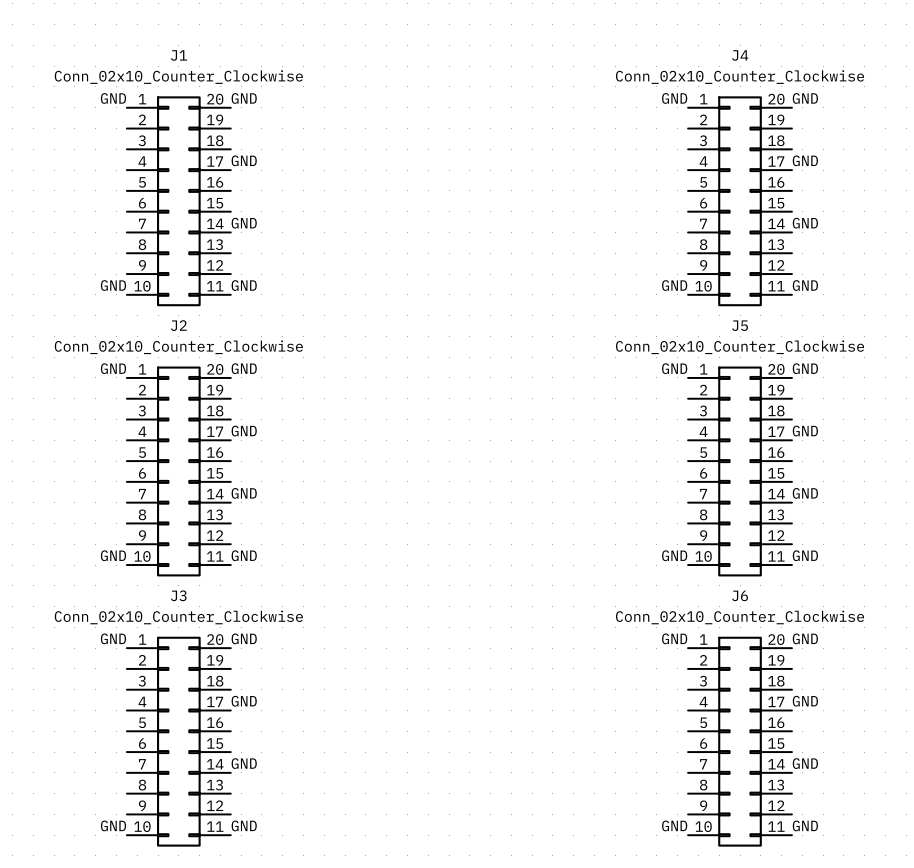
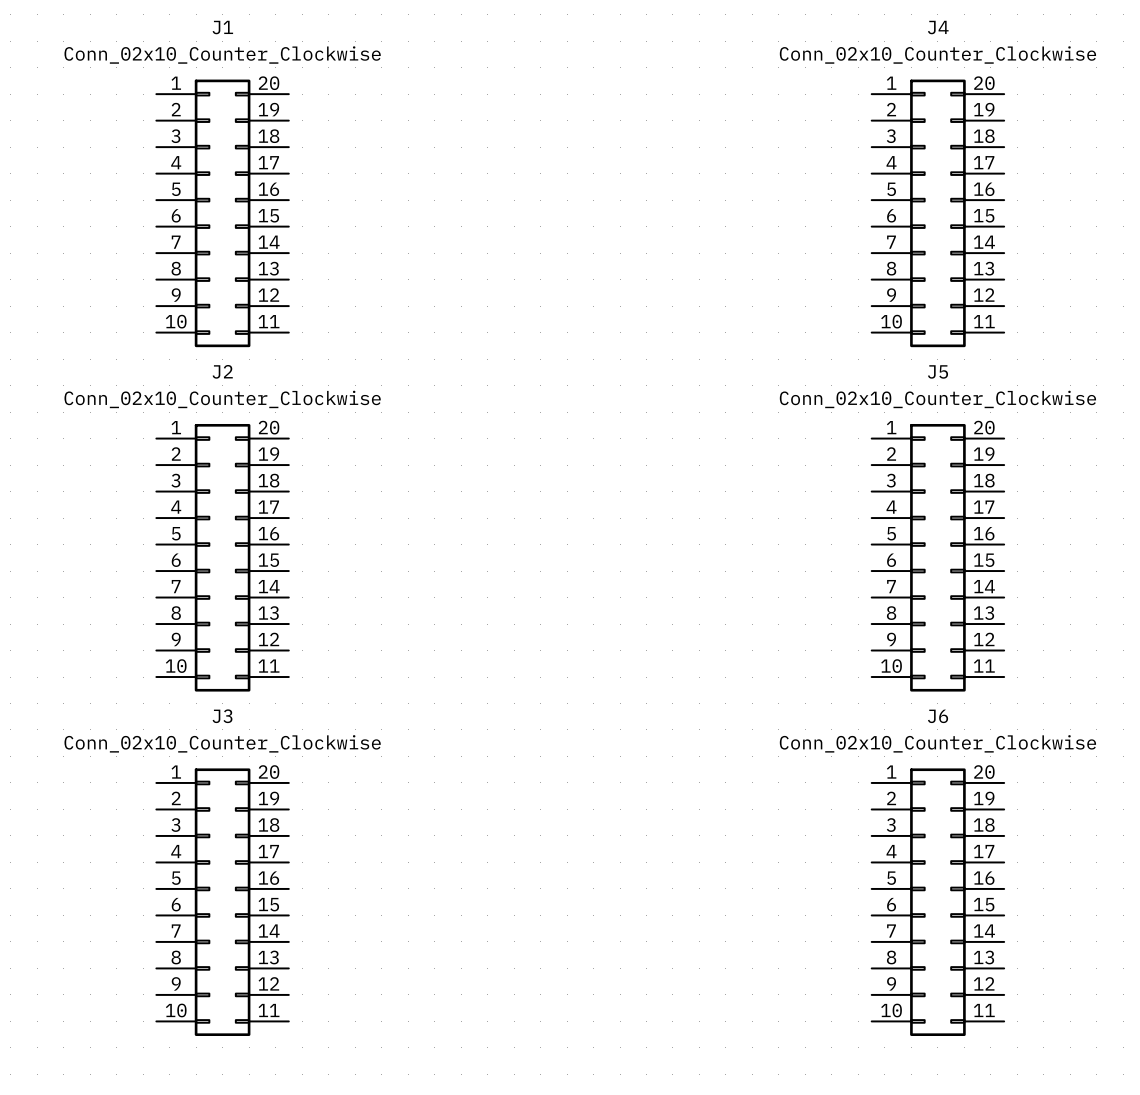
label: GND (113, 98) -> none
label: GND (244, 98) -> none
label: GND (674, 98) -> none
label: GND (805, 98) -> none
label: GND (244, 160) -> none
label: GND (805, 160) -> none
label: GND (244, 223) -> none
label: GND (805, 223) -> none
label: GND (113, 285) -> none
label: GND (244, 285) -> none
label: GND (674, 285) -> none
label: GND (805, 285) -> none
label: GND (113, 368) -> none
label: GND (244, 368) -> none
label: GND (674, 368) -> none
label: GND (805, 368) -> none
label: GND (244, 431) -> none
label: GND (805, 431) -> none
label: GND (244, 493) -> none
label: GND (805, 493) -> none
label: GND (113, 555) -> none
label: GND (244, 555) -> none
label: GND (674, 555) -> none
label: GND (805, 555) -> none
label: GND (113, 638) -> none
label: GND (244, 638) -> none
label: GND (674, 638) -> none
label: GND (805, 638) -> none
label: GND (244, 701) -> none
label: GND (805, 701) -> none
label: GND (244, 763) -> none
label: GND (805, 763) -> none
label: GND (113, 825) -> none
label: GND (244, 825) -> none
label: GND (674, 825) -> none
label: GND (805, 825) -> none

